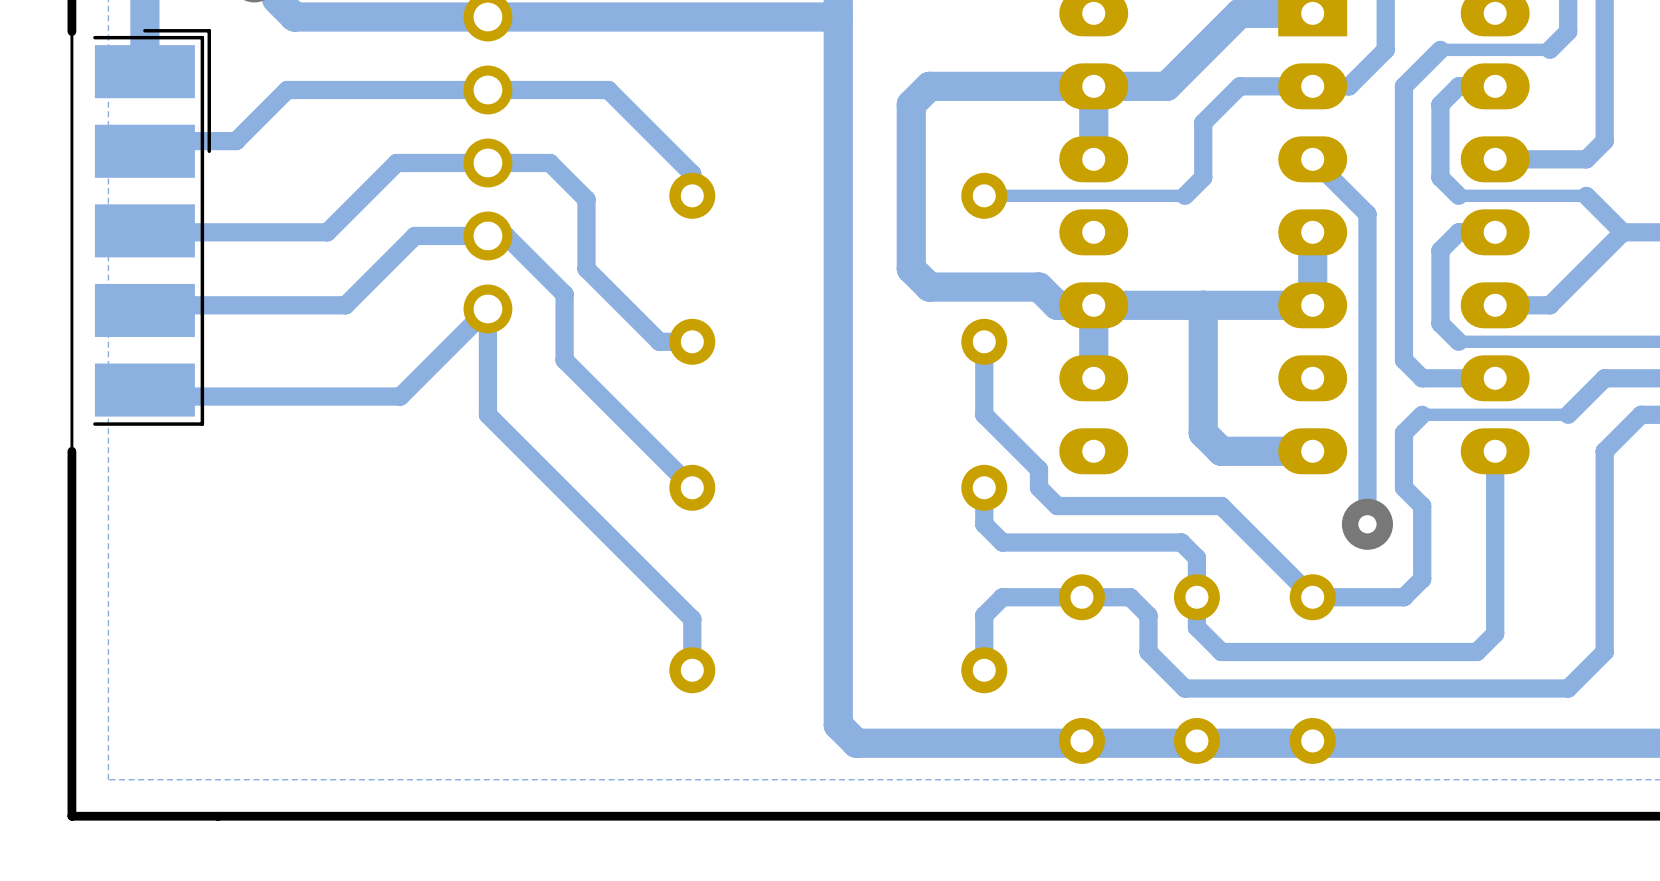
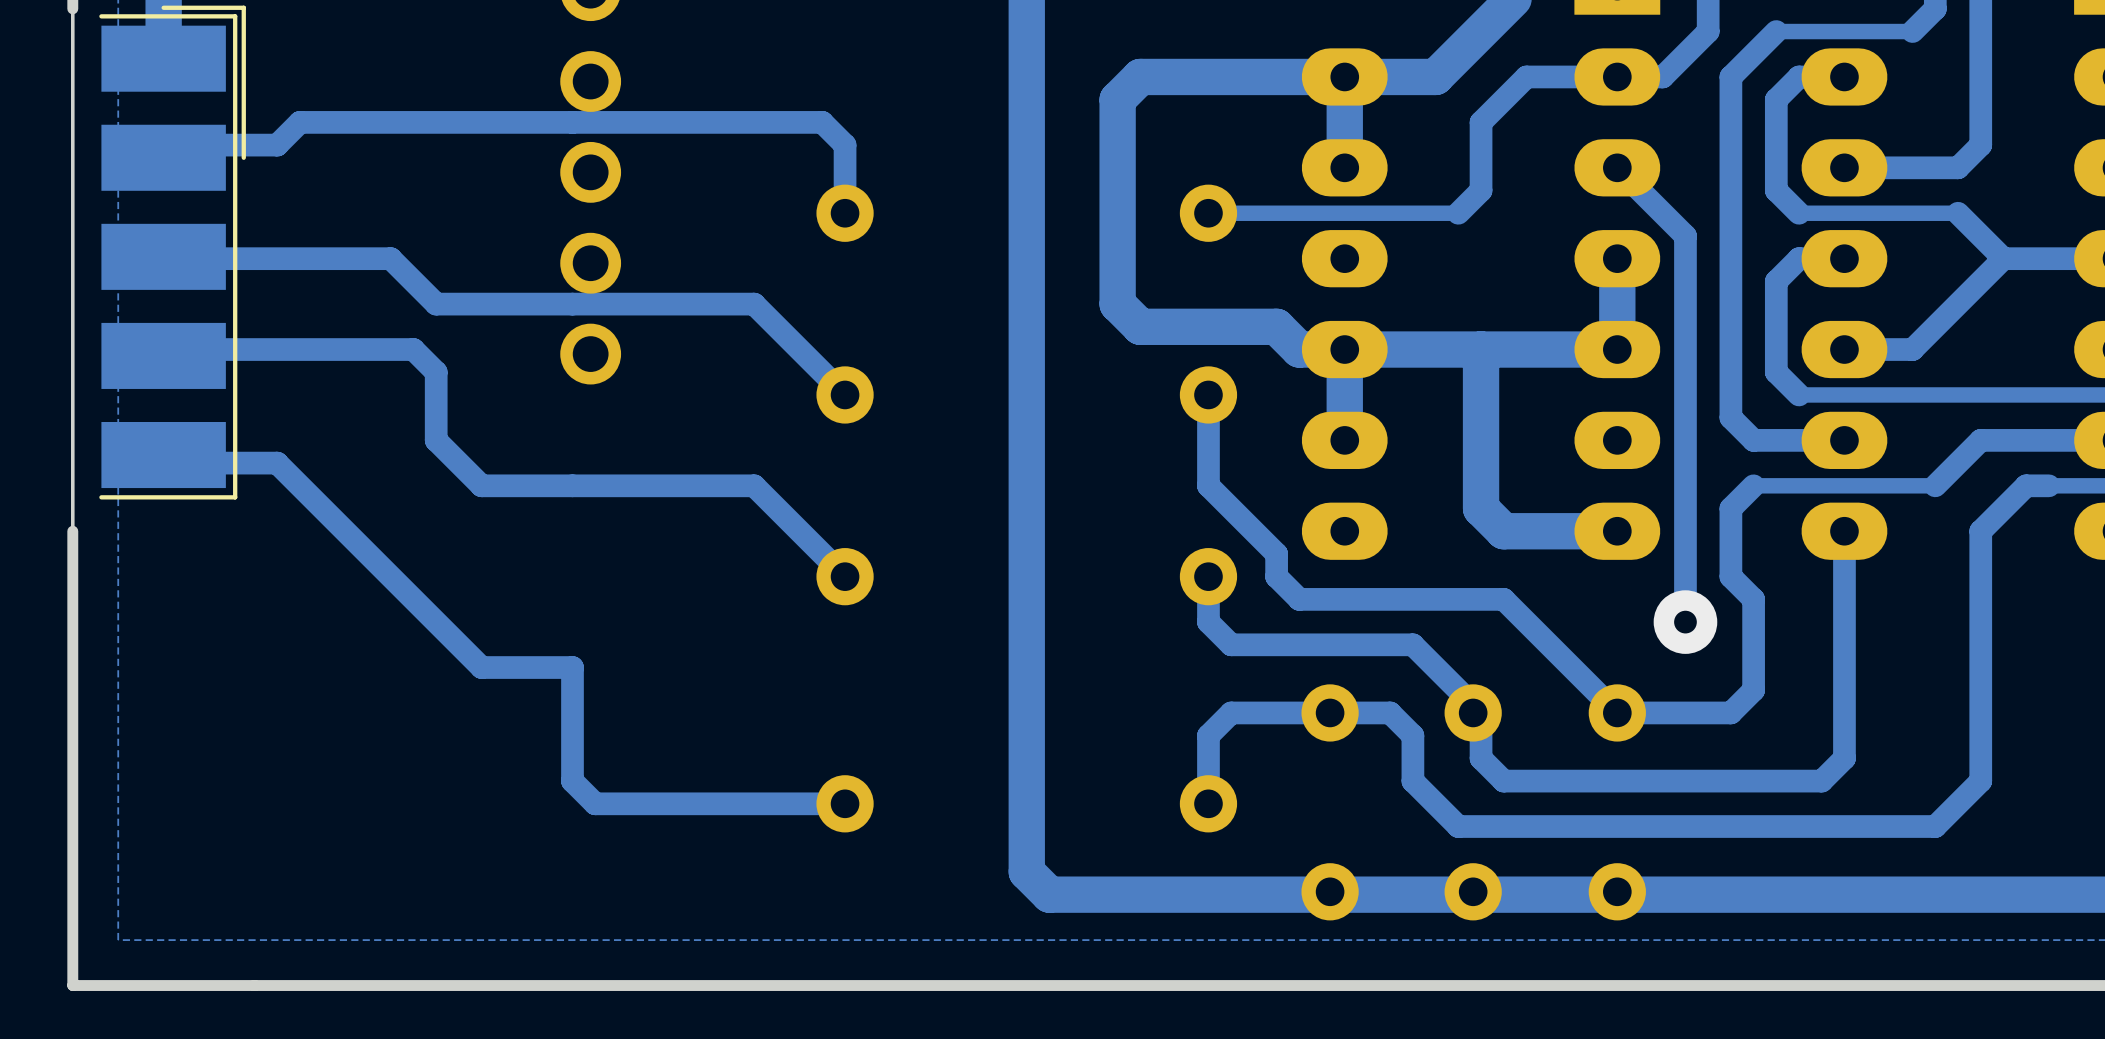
track: (254, 122) (287, 89) (608, 89) (692, 173) -> (299, 122) (822, 122) (845, 145) (845, 185)
track: (327, 232) (396, 162) (549, 162) (586, 199) (586, 268) (659, 341) (692, 341) -> (390, 258) (436, 304) (754, 304) (845, 394)
track: (345, 305) (414, 235) (506, 235) (564, 294) (564, 360) (619, 414) -> (413, 349) (436, 372) (436, 440) (481, 485) (754, 485)
track: (236, 396) (400, 396) (487, 308) (487, 414) (692, 619) (692, 670) -> (277, 463) (481, 667) (572, 667) (572, 781) (595, 803) (845, 803)
track: (1148, 542) (1181, 542) (1196, 557) (1196, 627) (1203, 633) -> (1412, 644) (1481, 712) (1481, 758)

